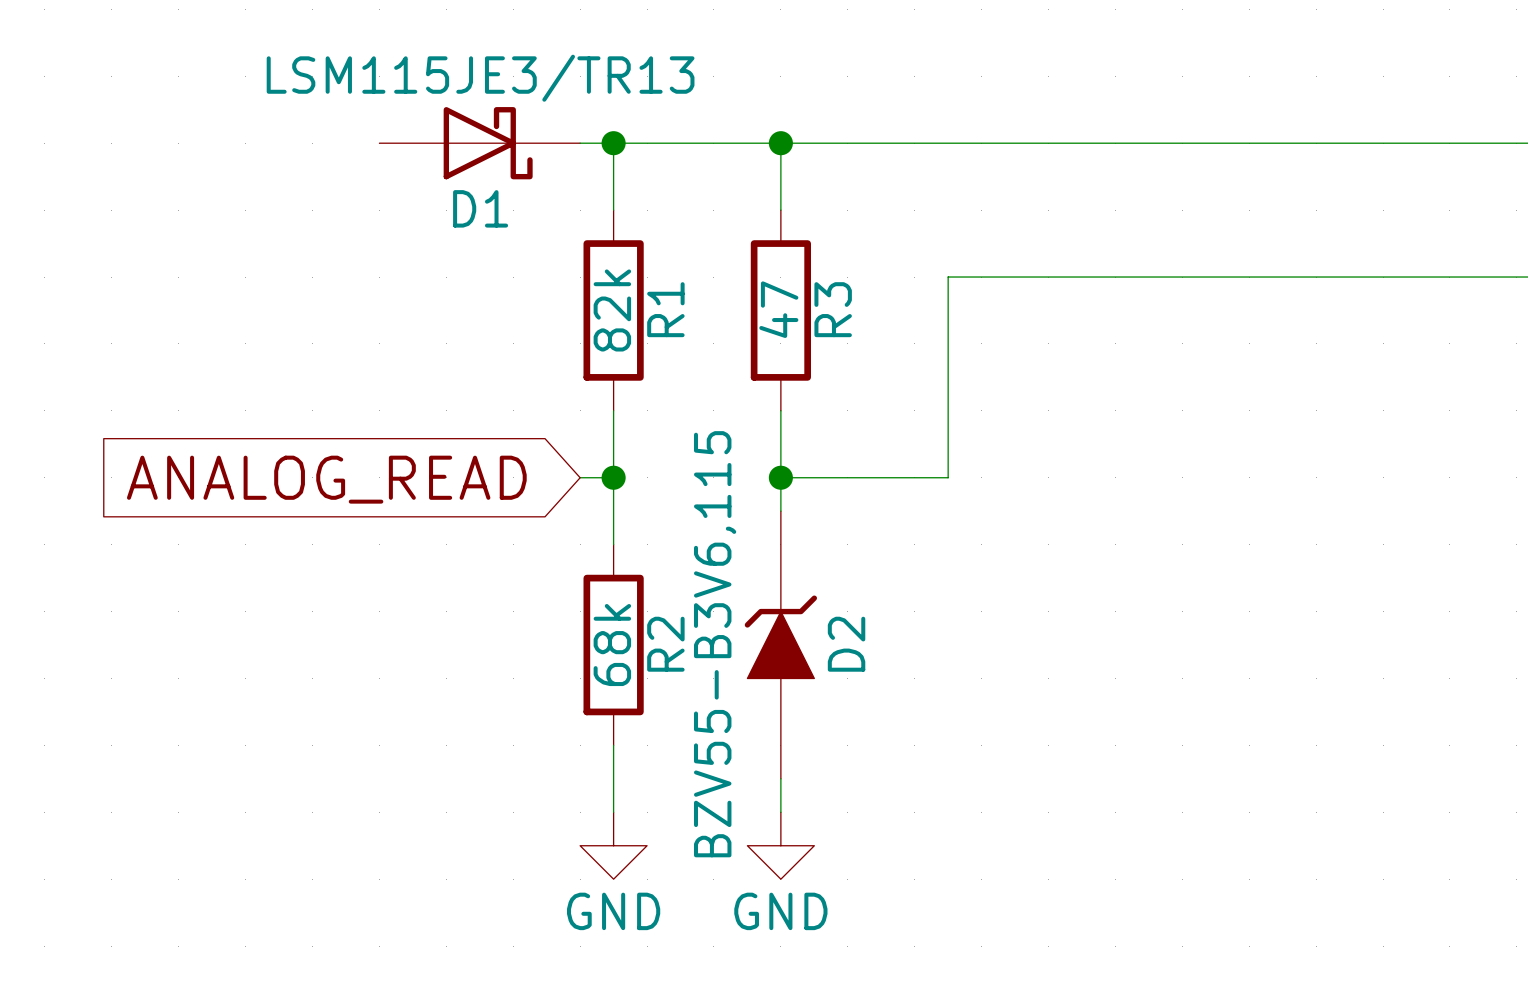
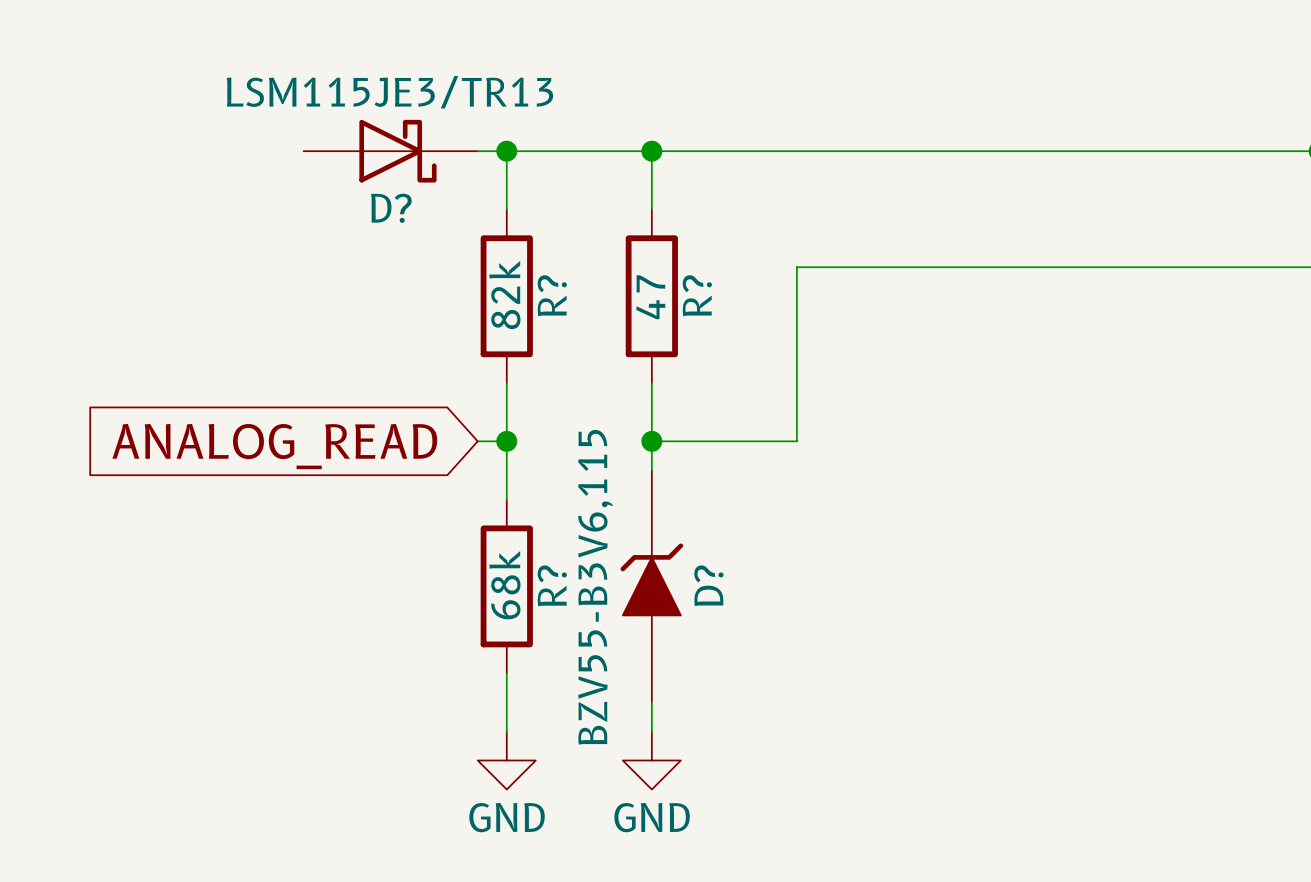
D1 name: D1 (480, 208) -> D? (391, 208)
R1 name: R1 (665, 309) -> R? (552, 295)
R3 name: R3 (833, 309) -> R? (697, 295)
R2 name: R2 (665, 644) -> R? (552, 585)
D2 name: D2 (846, 644) -> D? (708, 585)

